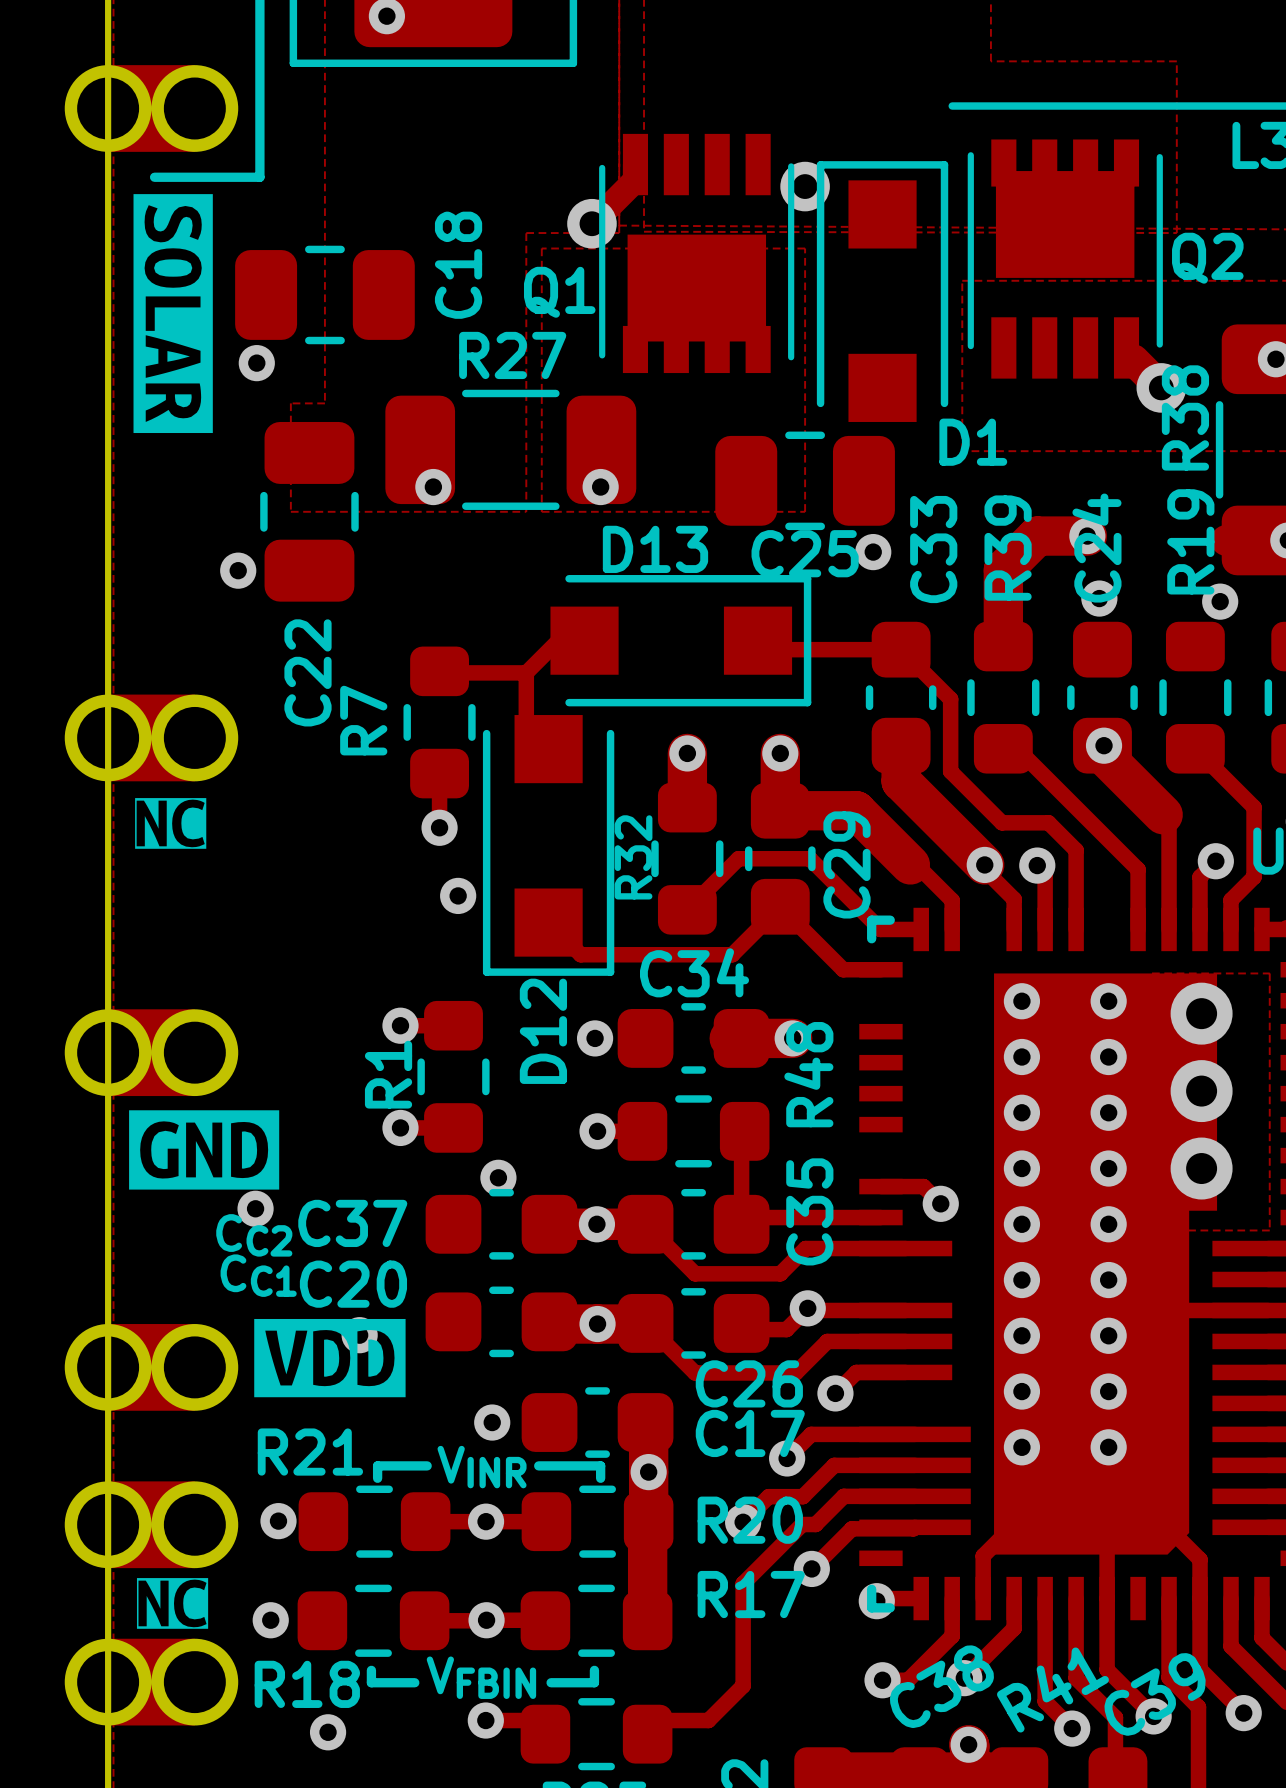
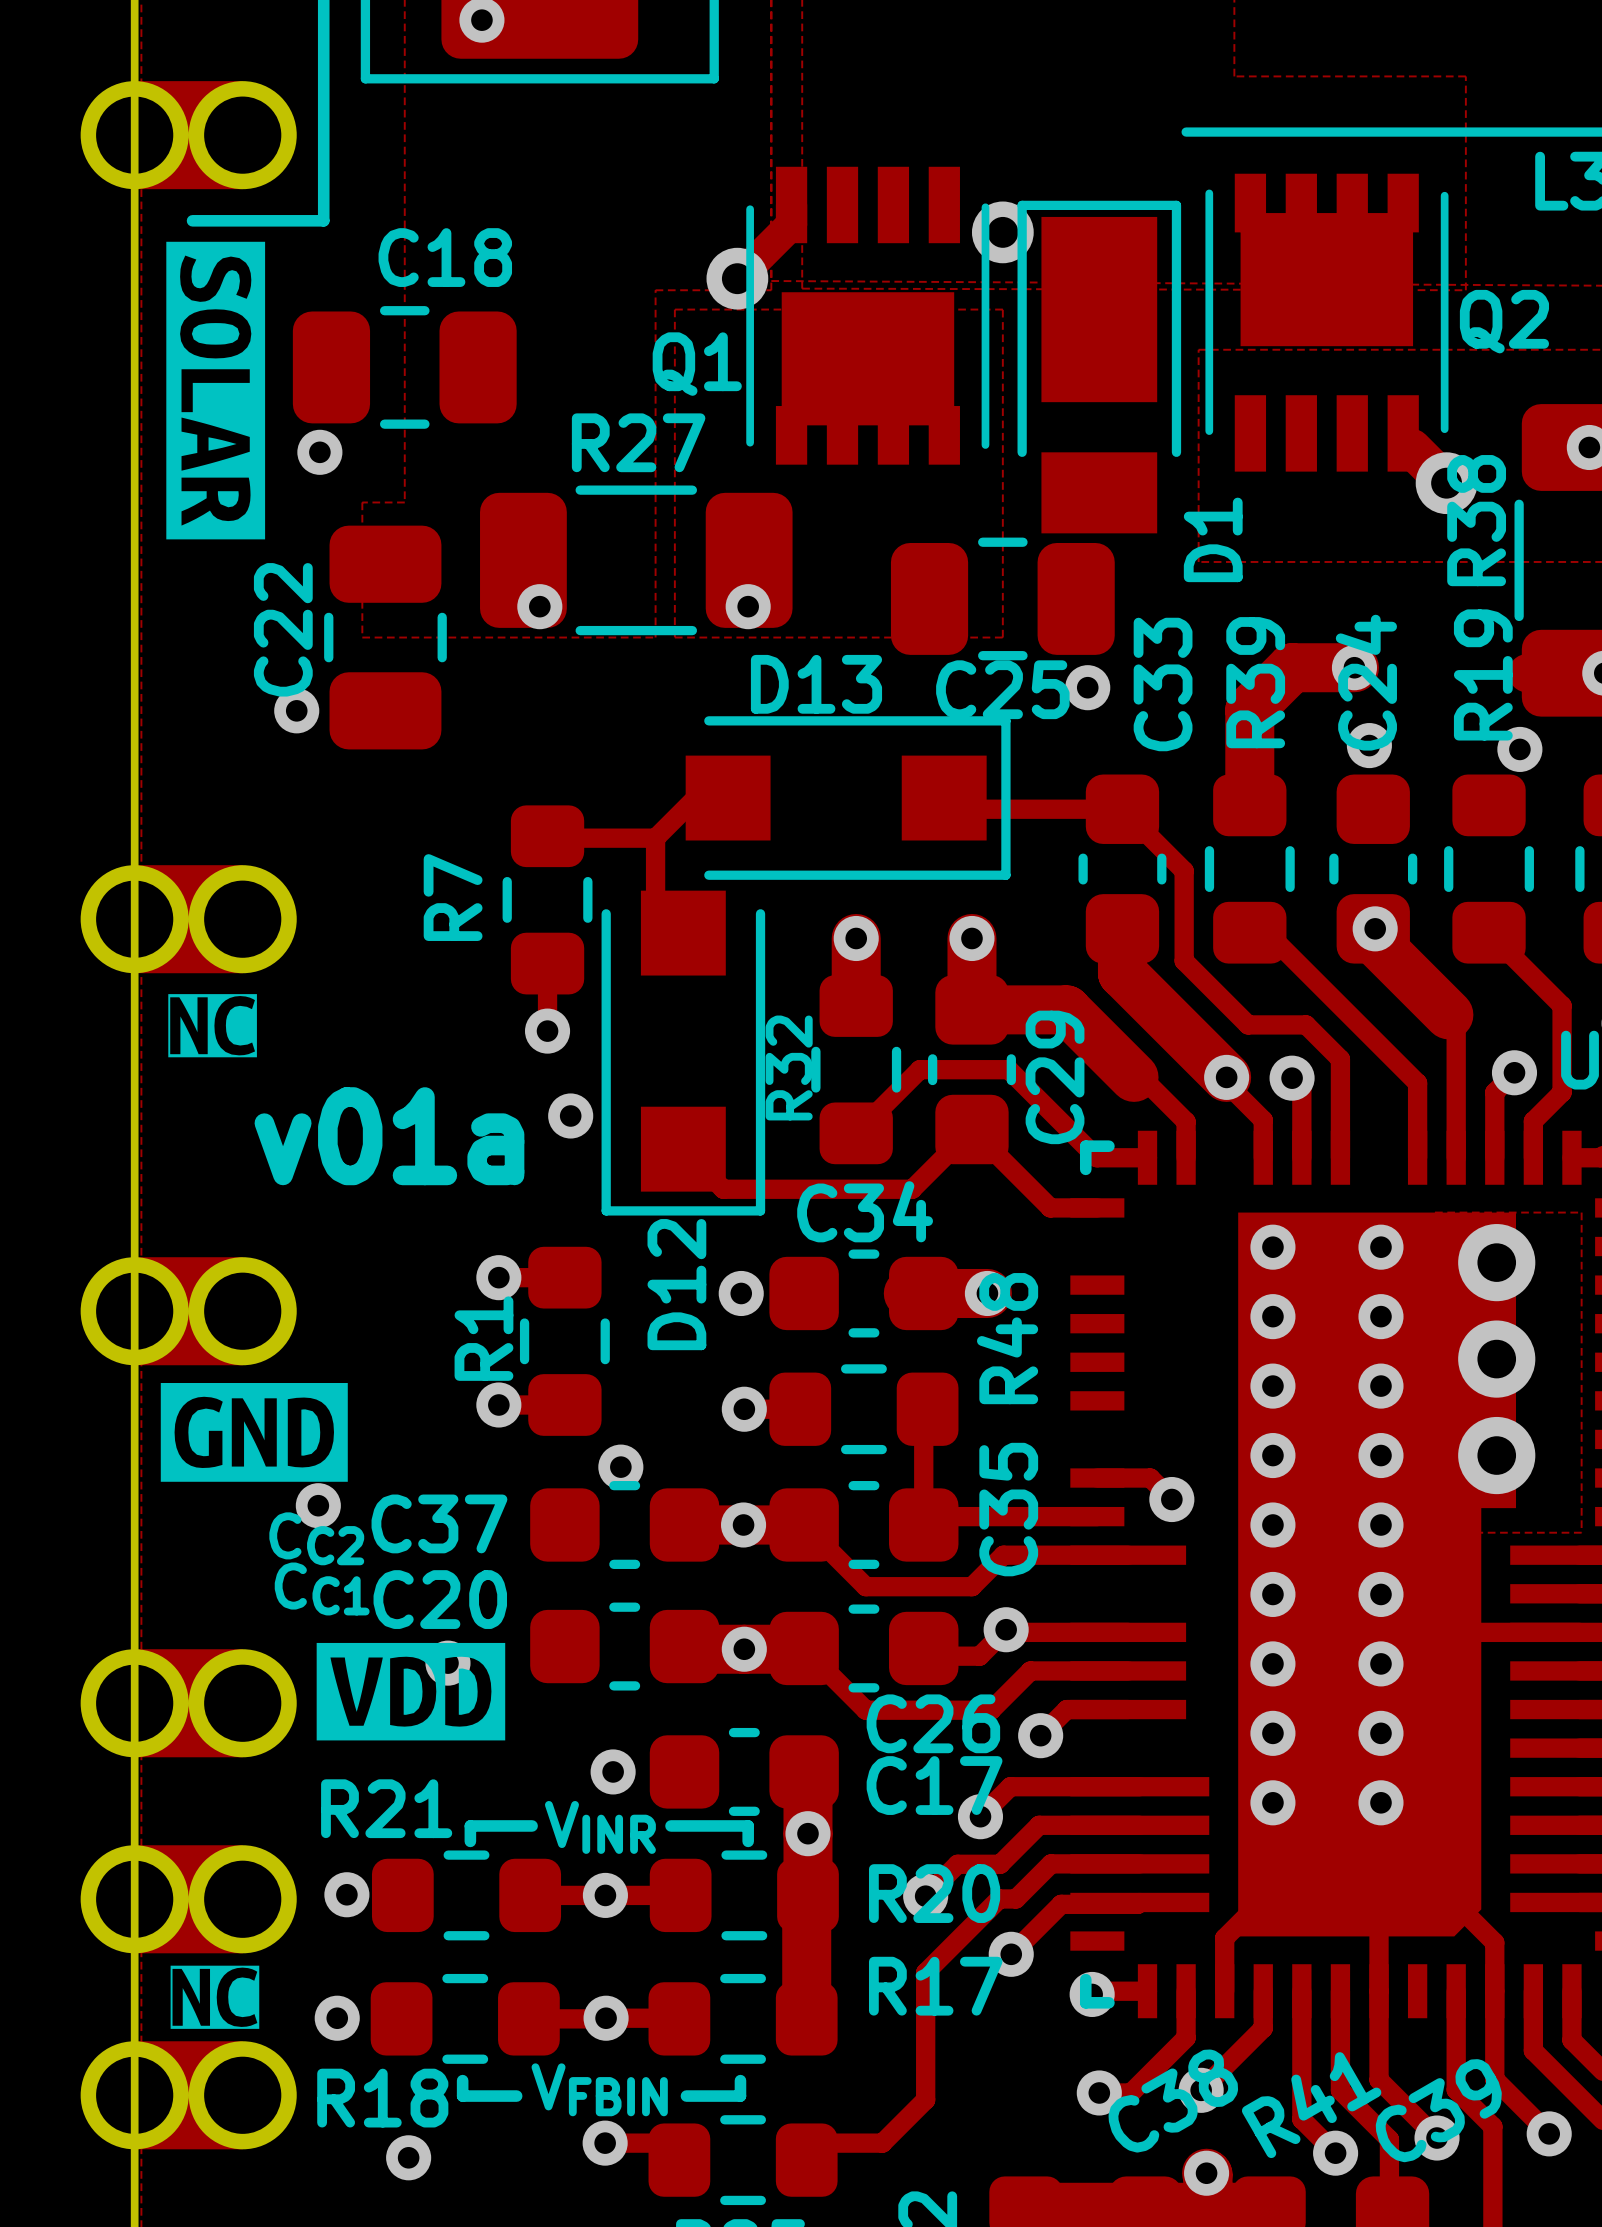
D1 footprint: [816, 161, 949, 422] -> [1017, 200, 1182, 534]
C18 name rotation: 0° (458, 265) -> 90° clockwise (445, 257)
D1 name rotation: 0° (973, 442) -> 90° counterclockwise (1213, 539)
C22 name position: C22 (307, 672) -> C22 (283, 629)
text: none -> v01a (389, 1136)

